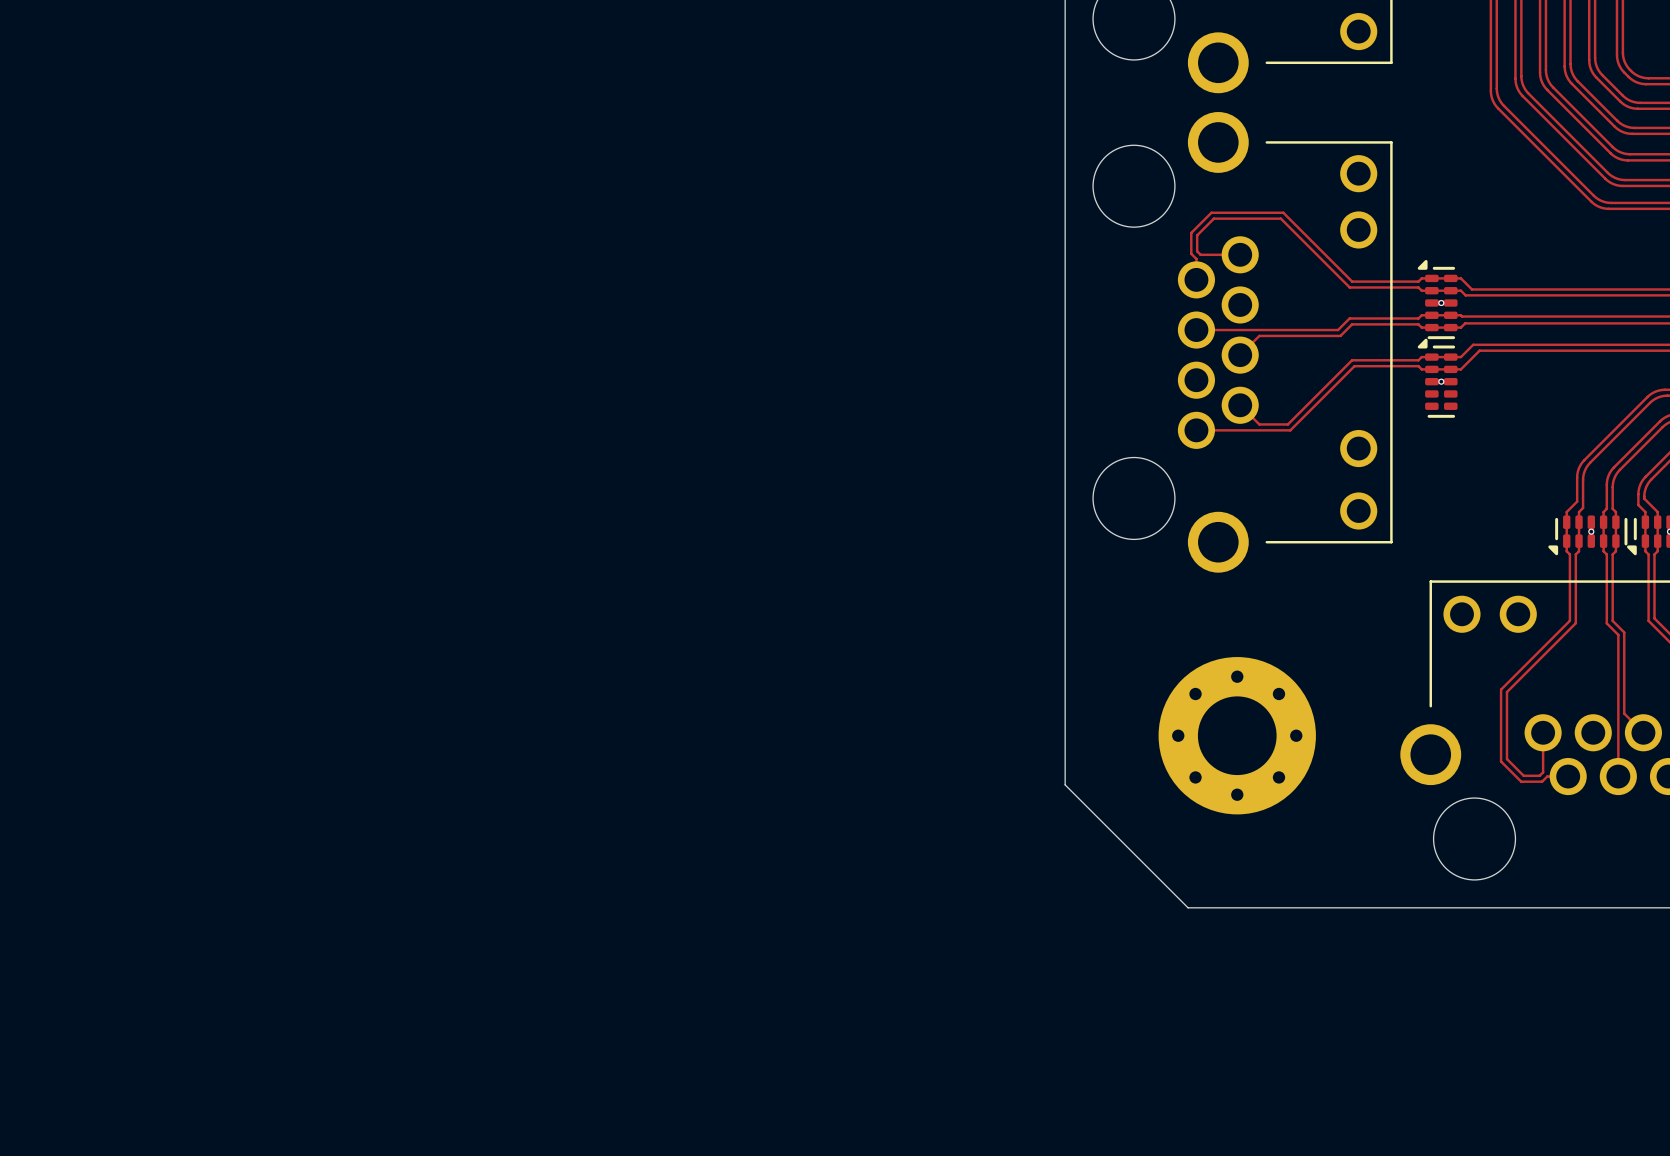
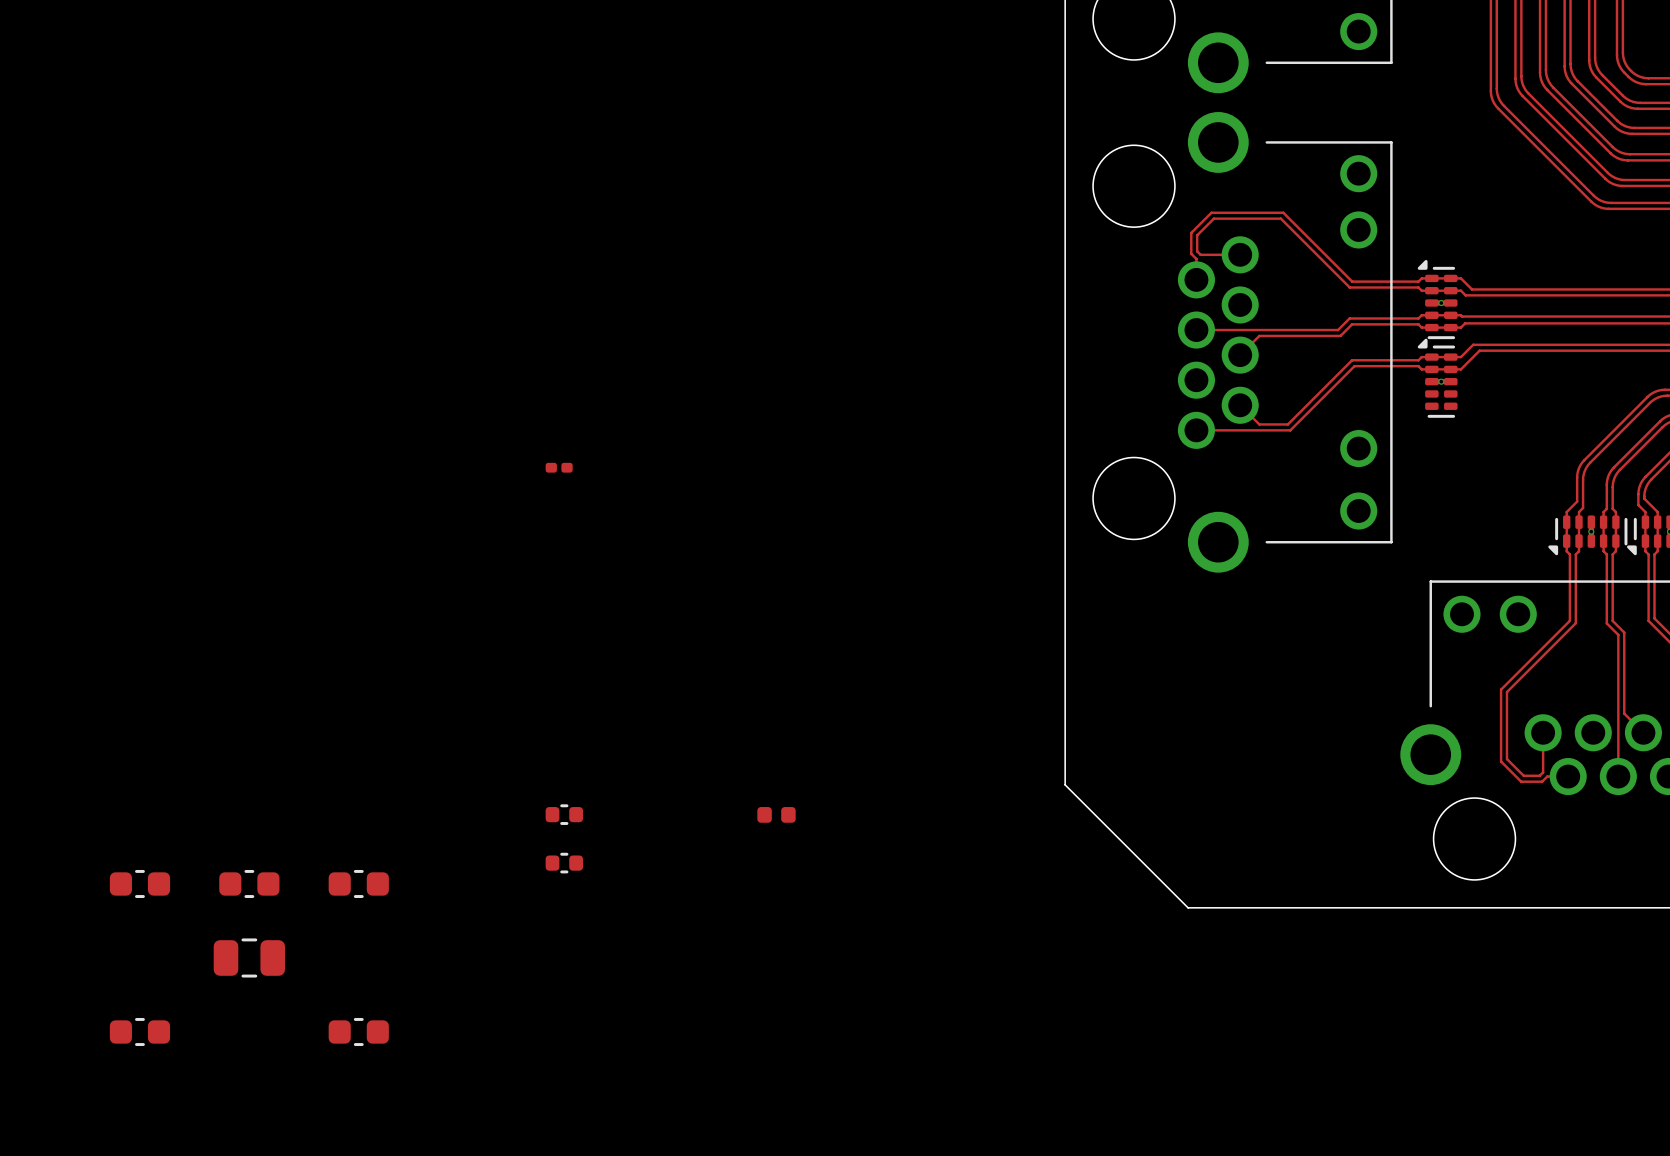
part: none -> (559, 467)
part: (1237, 735) -> none
part: none -> (564, 814)
part: none -> (776, 814)
part: none -> (564, 863)
part: none -> (139, 883)
part: none -> (249, 883)
part: none -> (358, 883)
part: none -> (249, 957)
part: none -> (139, 1031)
part: none -> (358, 1031)

